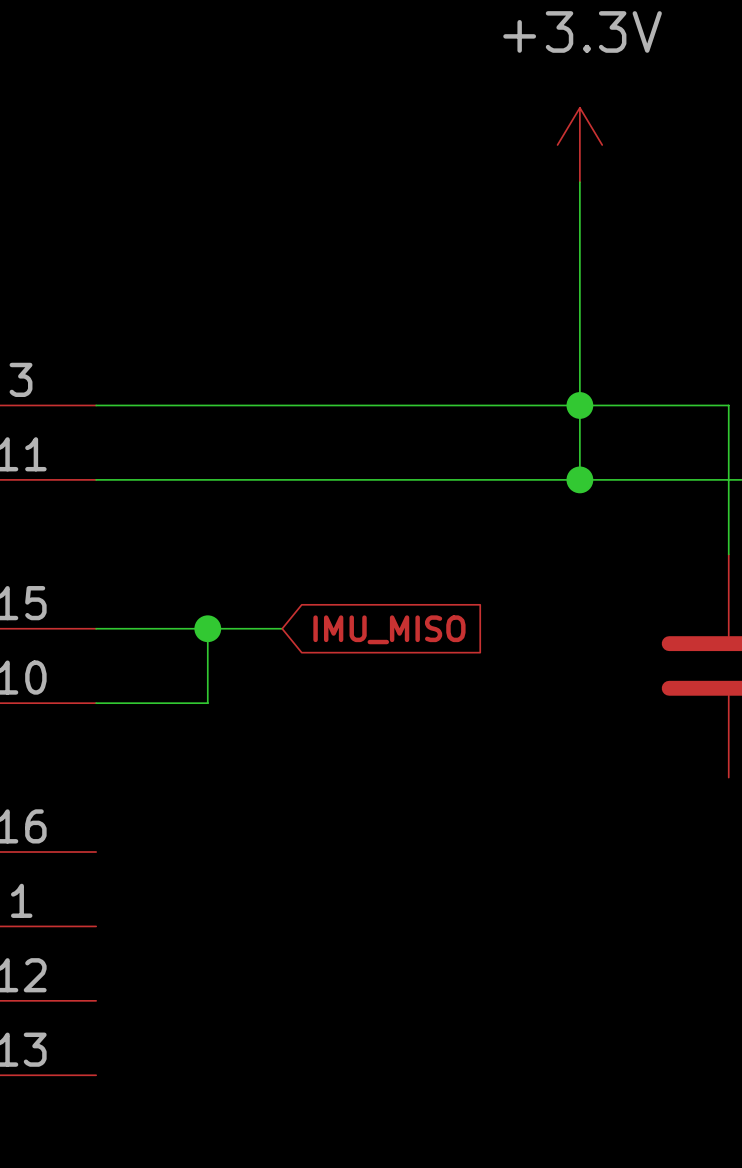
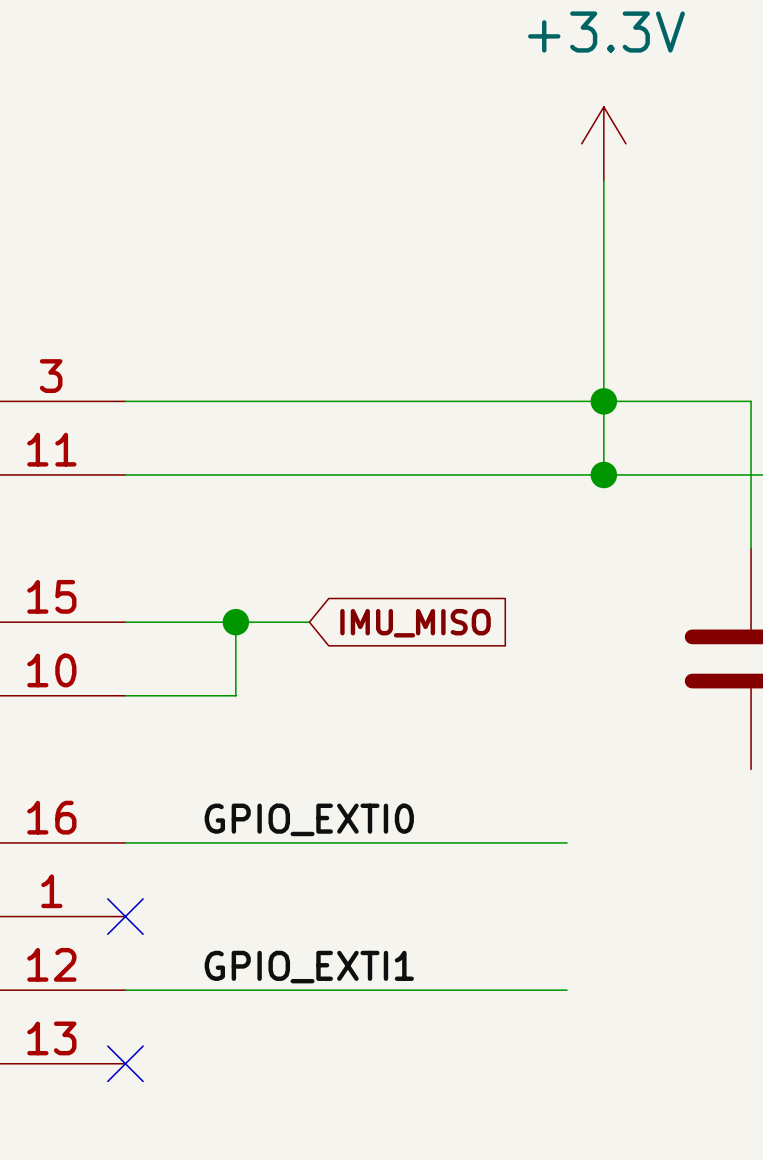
label: none -> GPIO_EXTI0 (309, 819)
wire: none -> (125, 842) (567, 842)
no-connect mark: none -> (125, 916)
label: none -> GPIO_EXTI1 (309, 967)
wire: none -> (125, 990) (567, 990)
no-connect mark: none -> (125, 1063)

